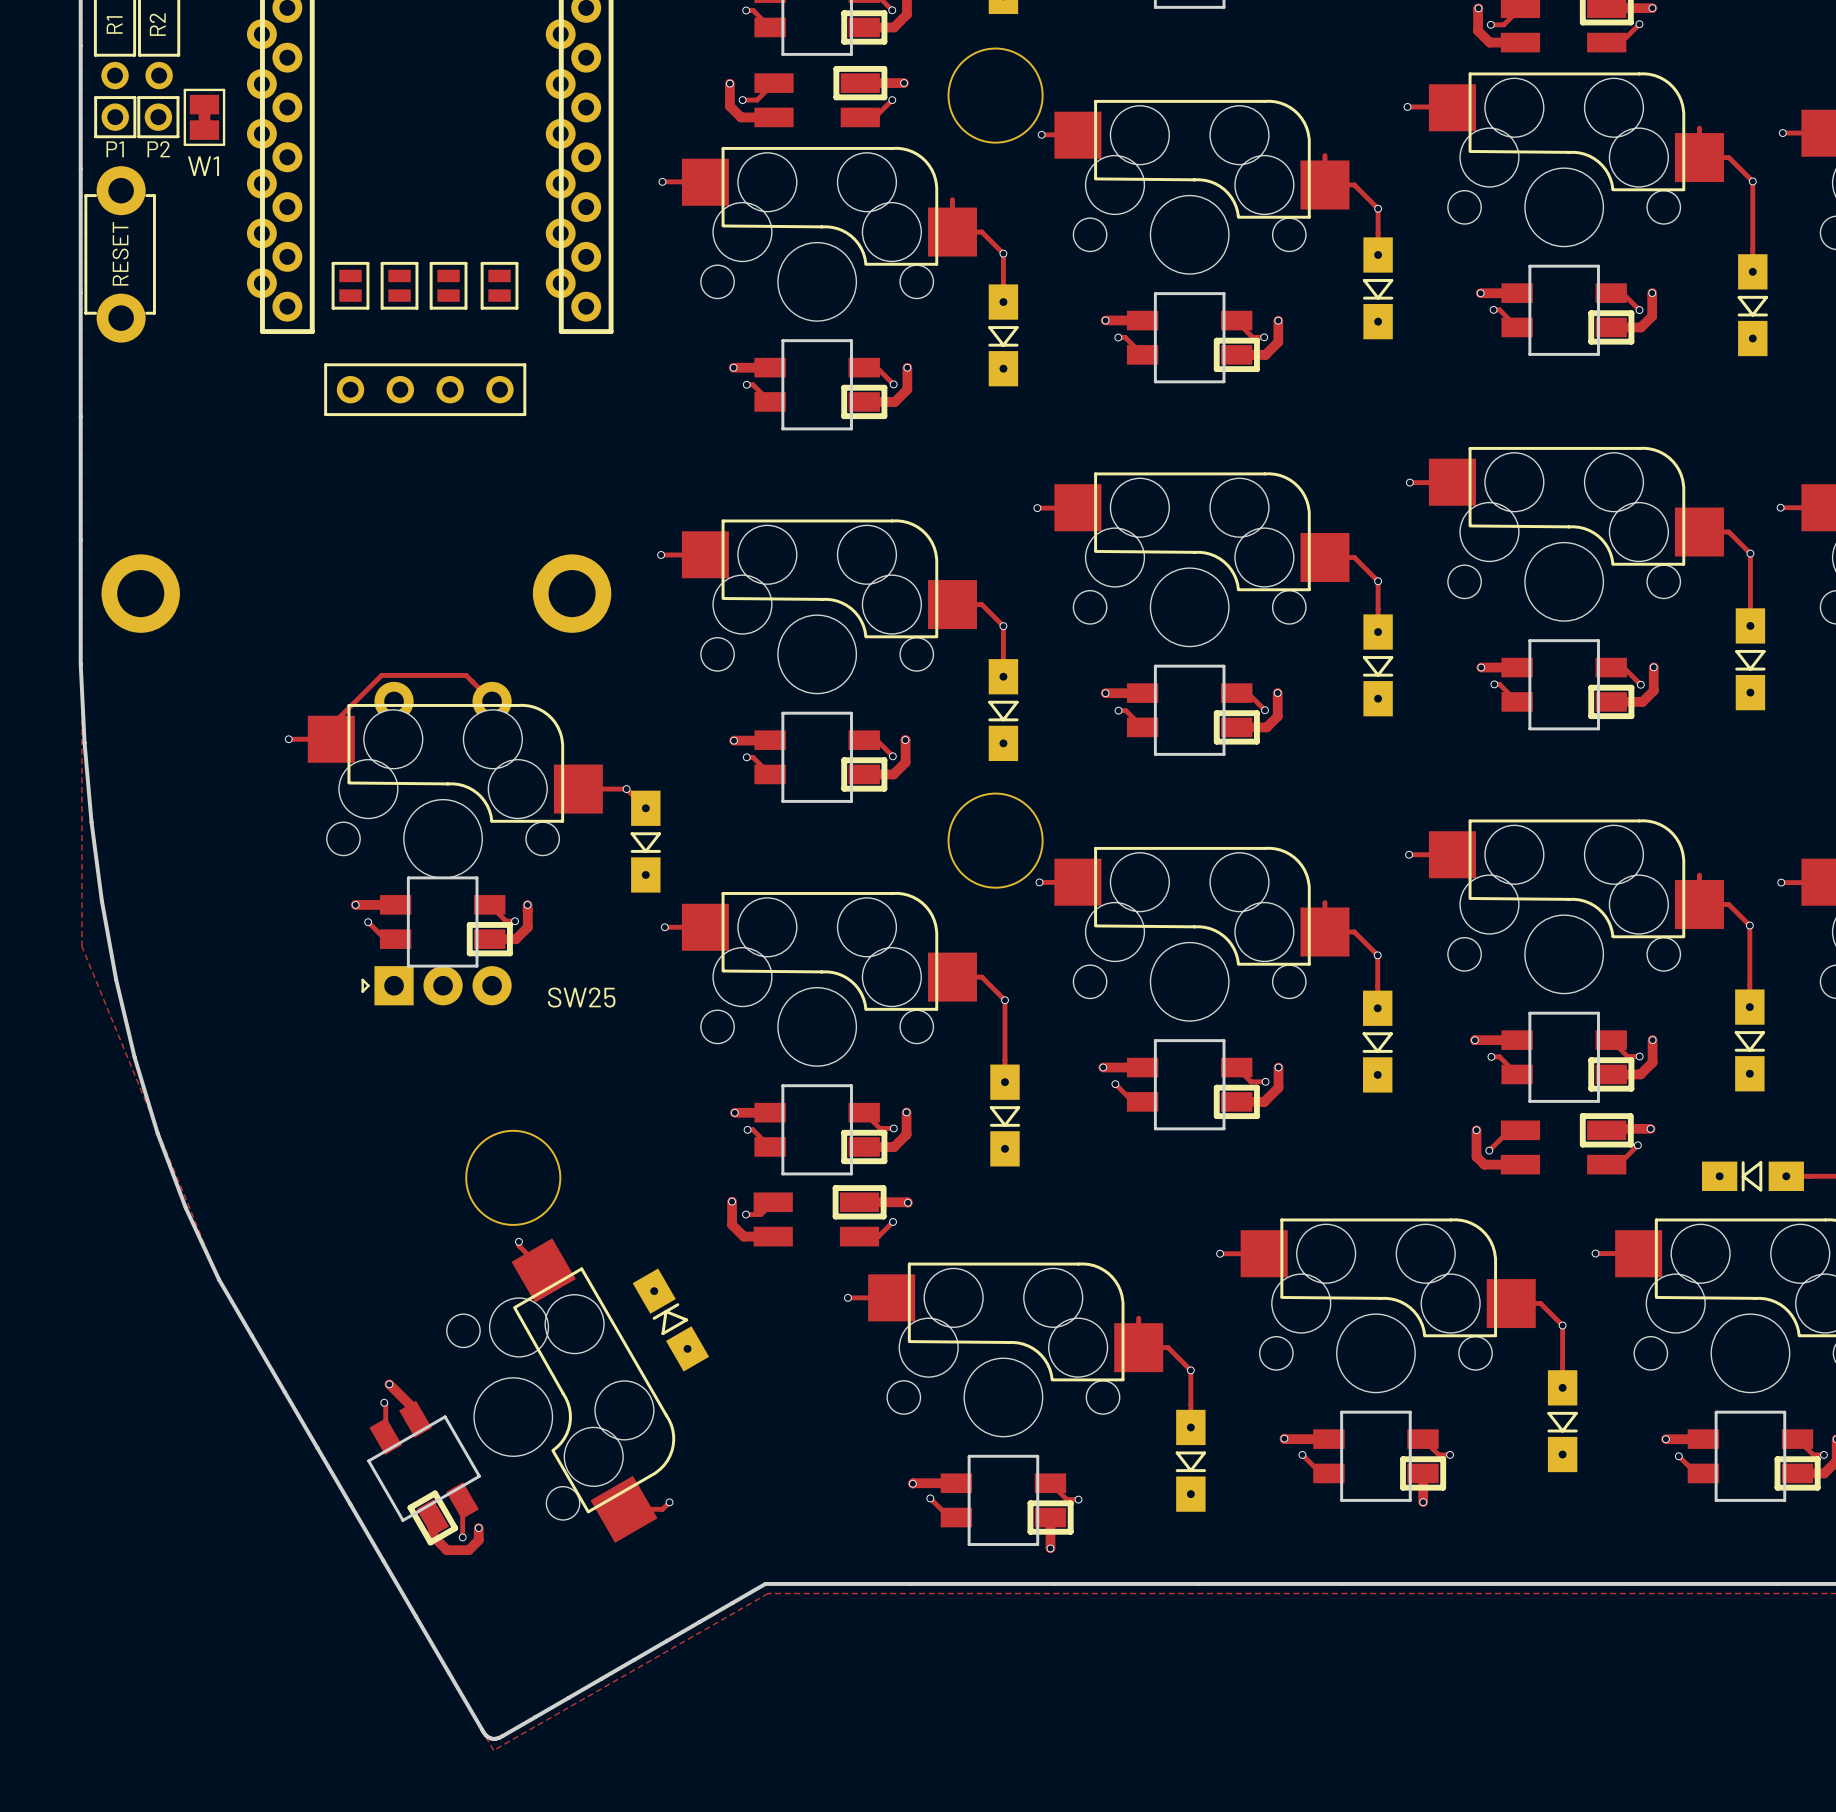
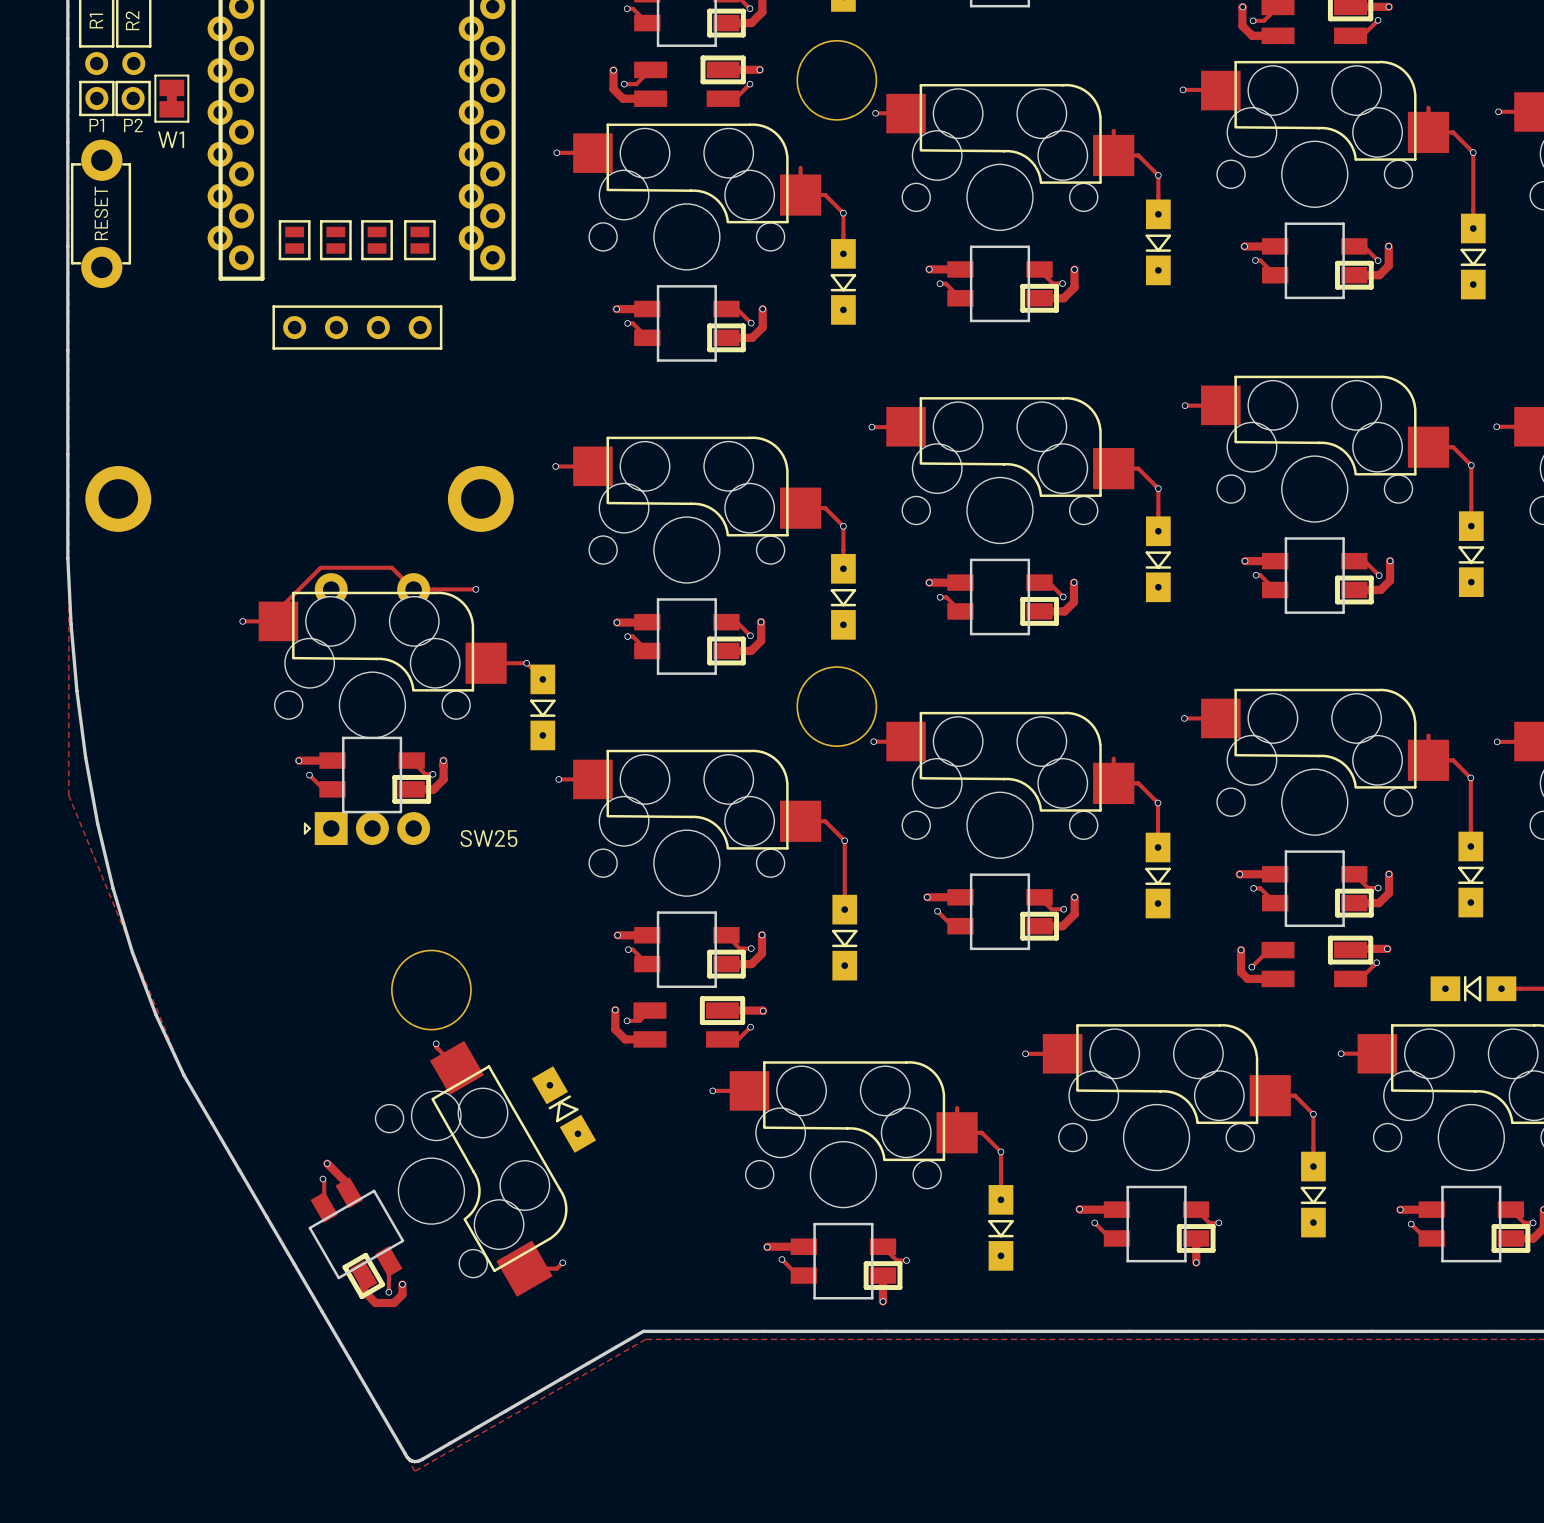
track: none -> (413, 589) (475, 589)
via: none -> (475, 589)

